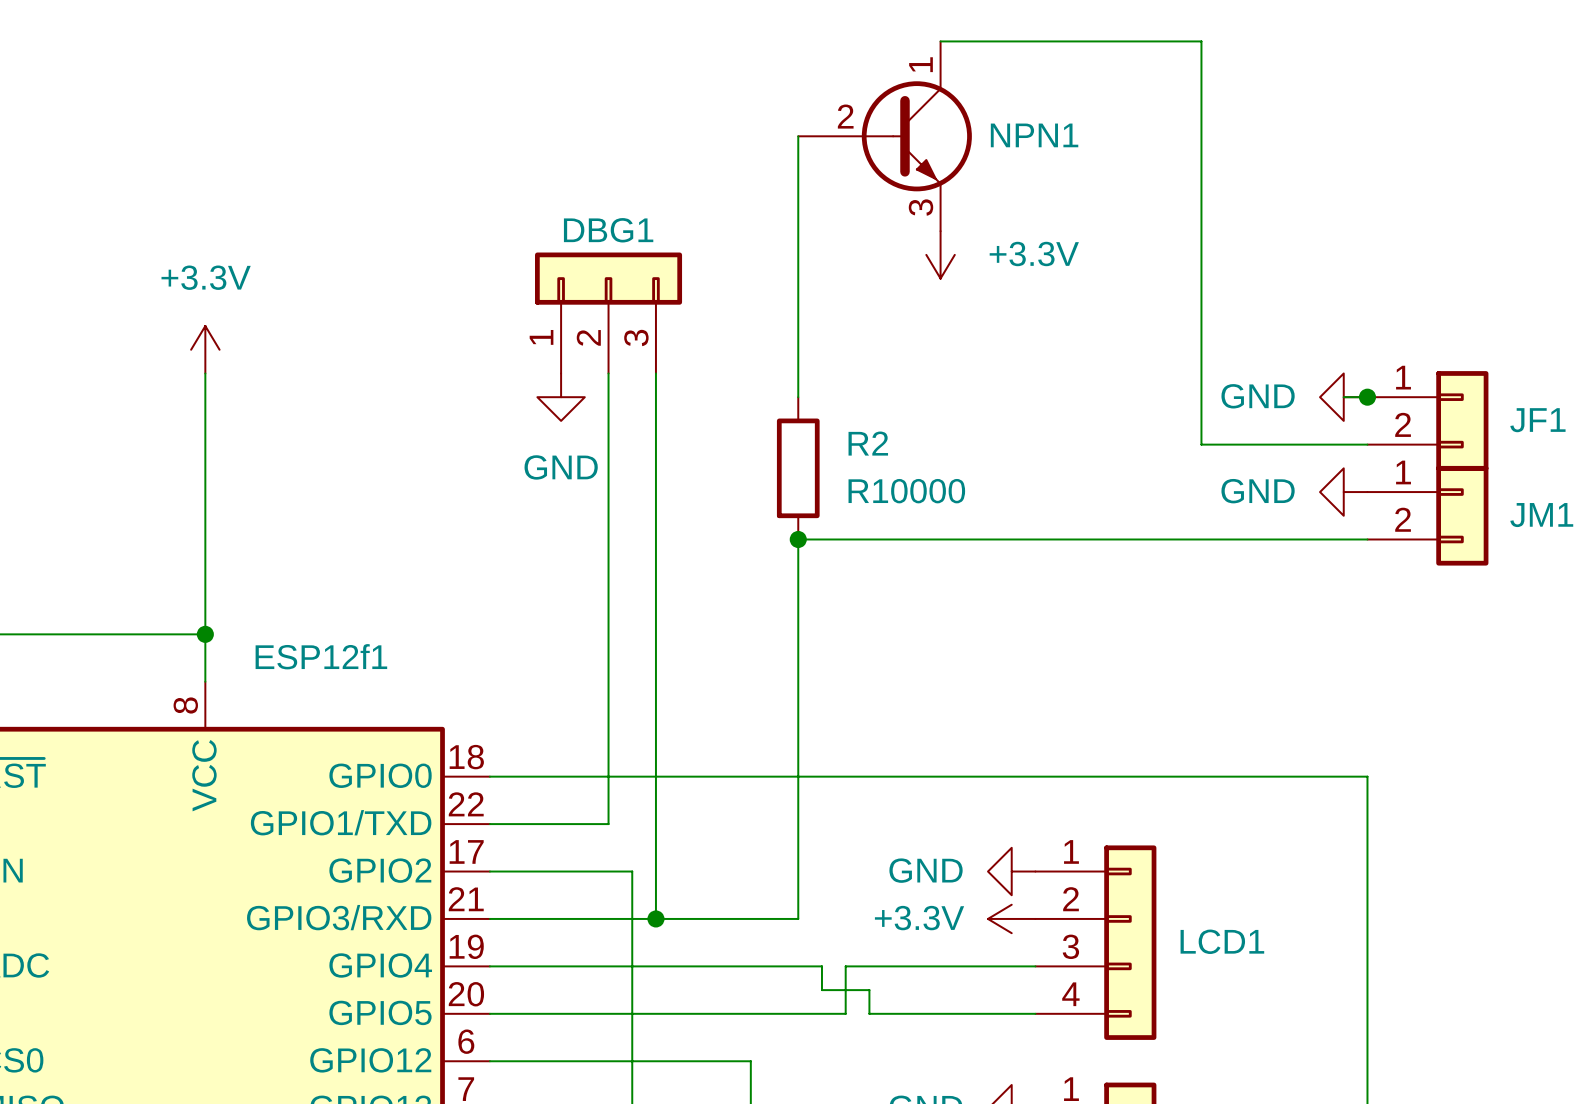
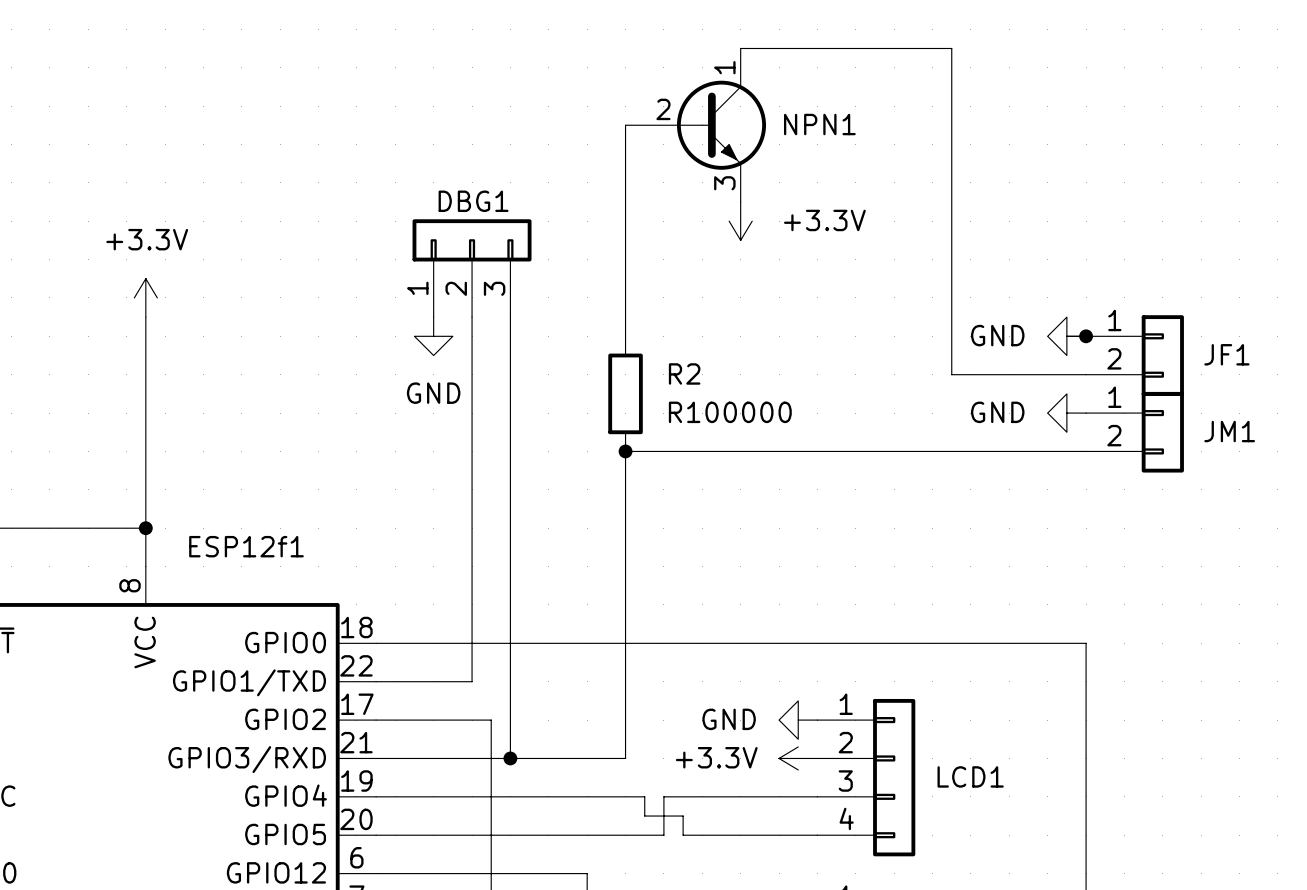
R2 value: R10000 (906, 491) -> R100000 (730, 412)

